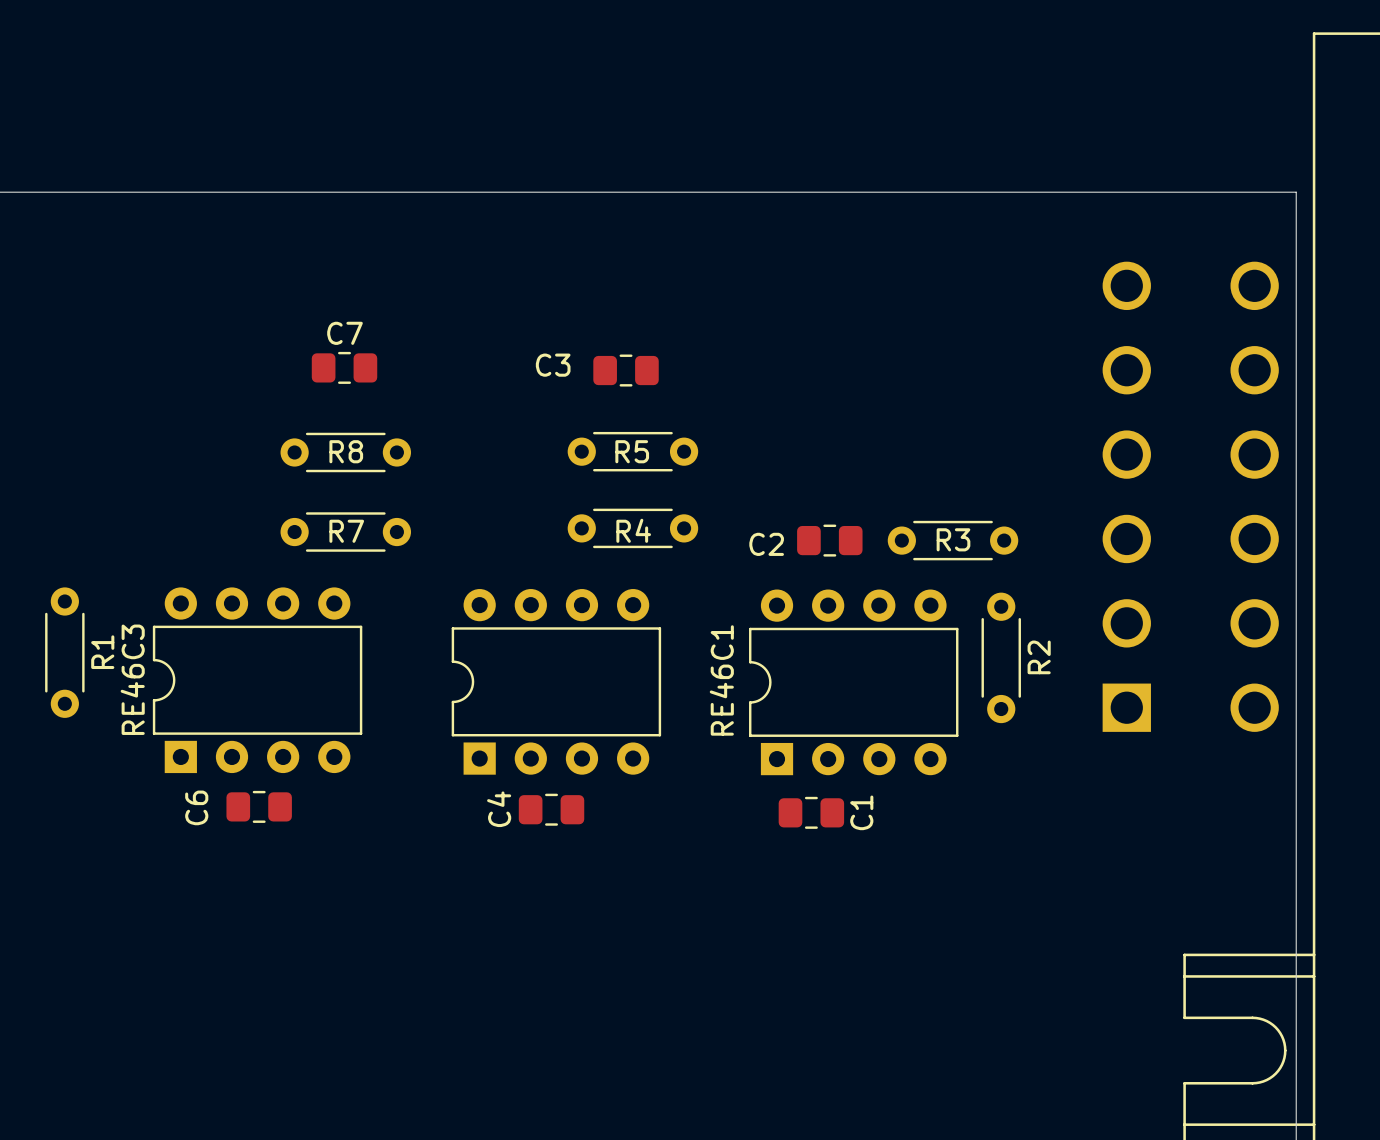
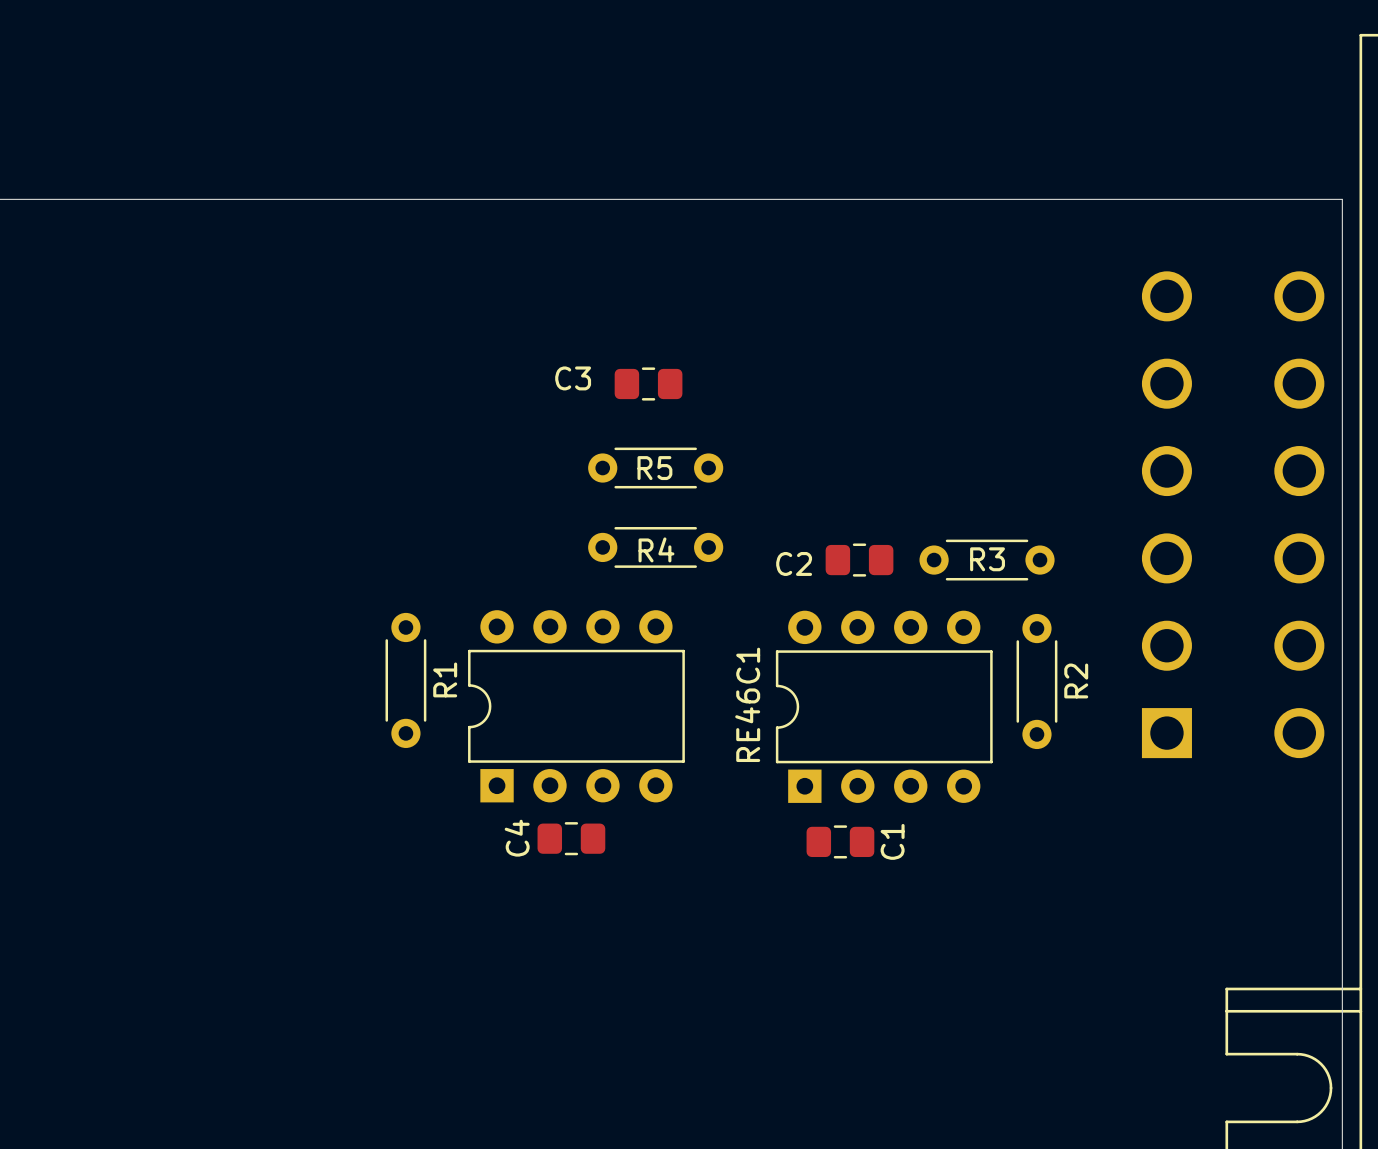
C7: (344, 367) -> none
R8: (345, 452) -> none
R7: (345, 532) -> none
R1 position: (64, 652) -> (405, 680)
RE46C3: (257, 680) -> none
C6: (259, 806) -> none

